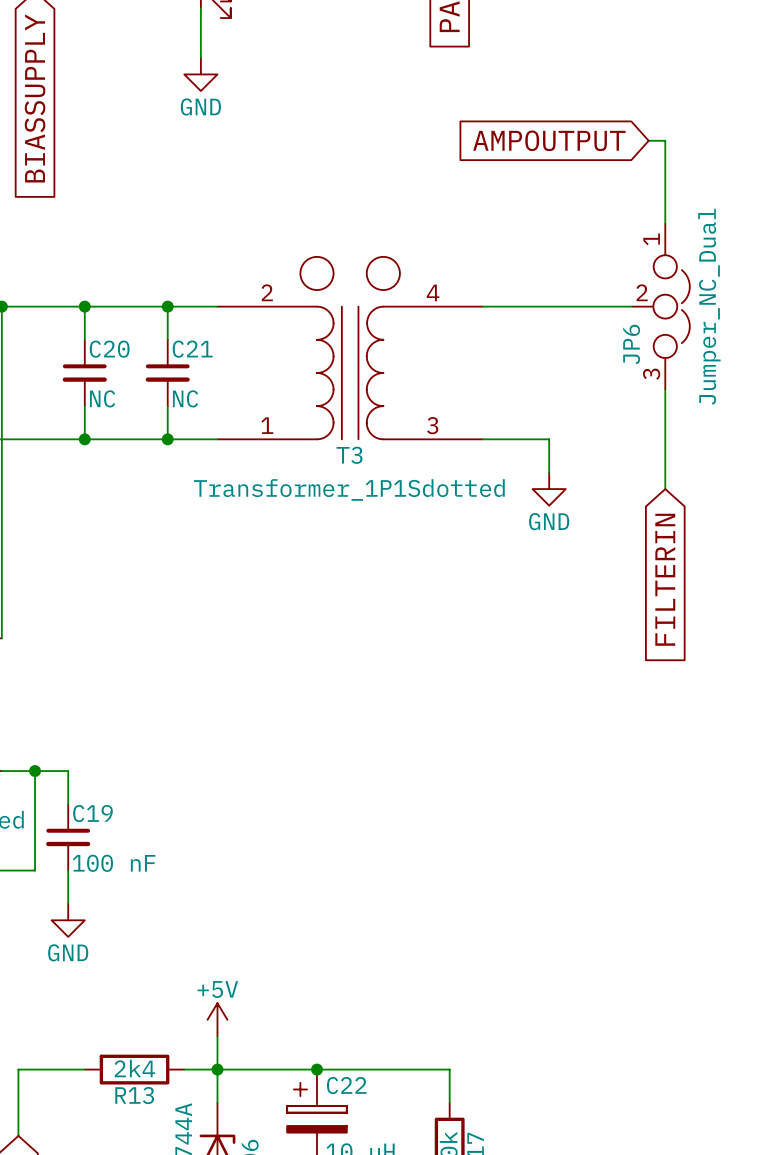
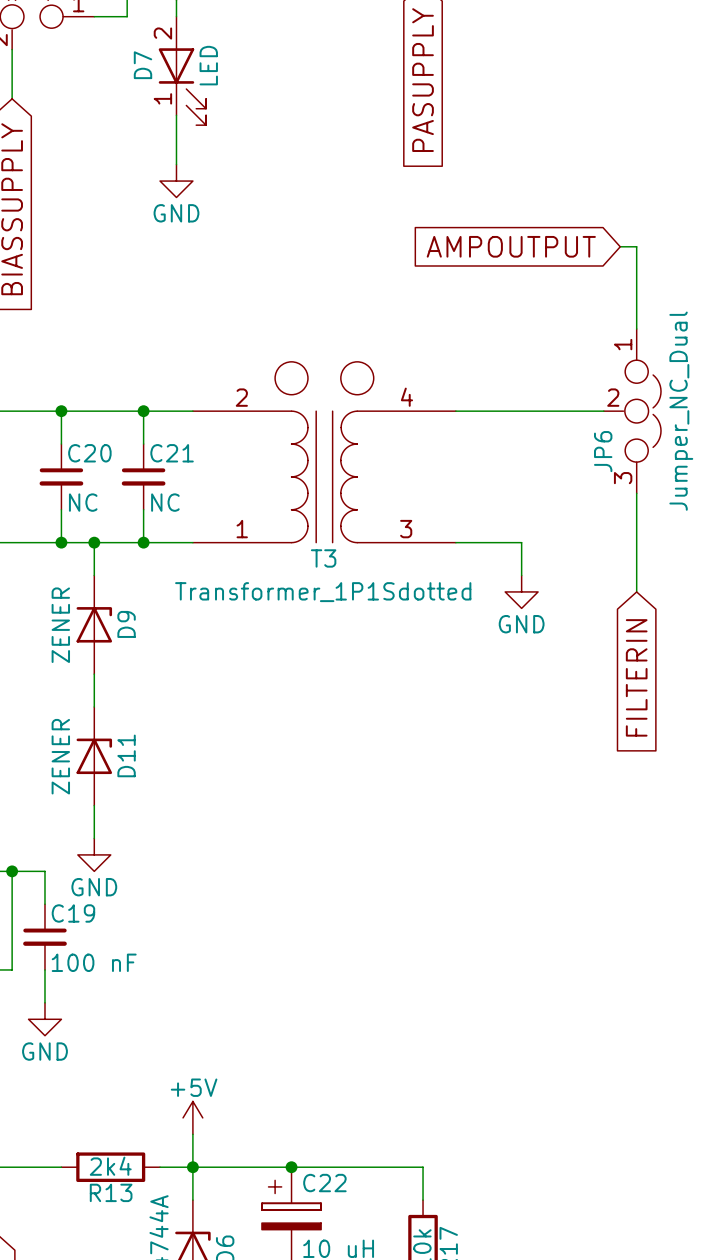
wire: none -> (94, 542) (94, 575)
junction: none -> (94, 542)
D9: none -> ZENER (94, 624)
wire: none -> (94, 674) (94, 707)
D11: none -> ZENER (94, 756)
wire: none -> (94, 805) (94, 838)
power symbol: none -> GND (94, 854)

